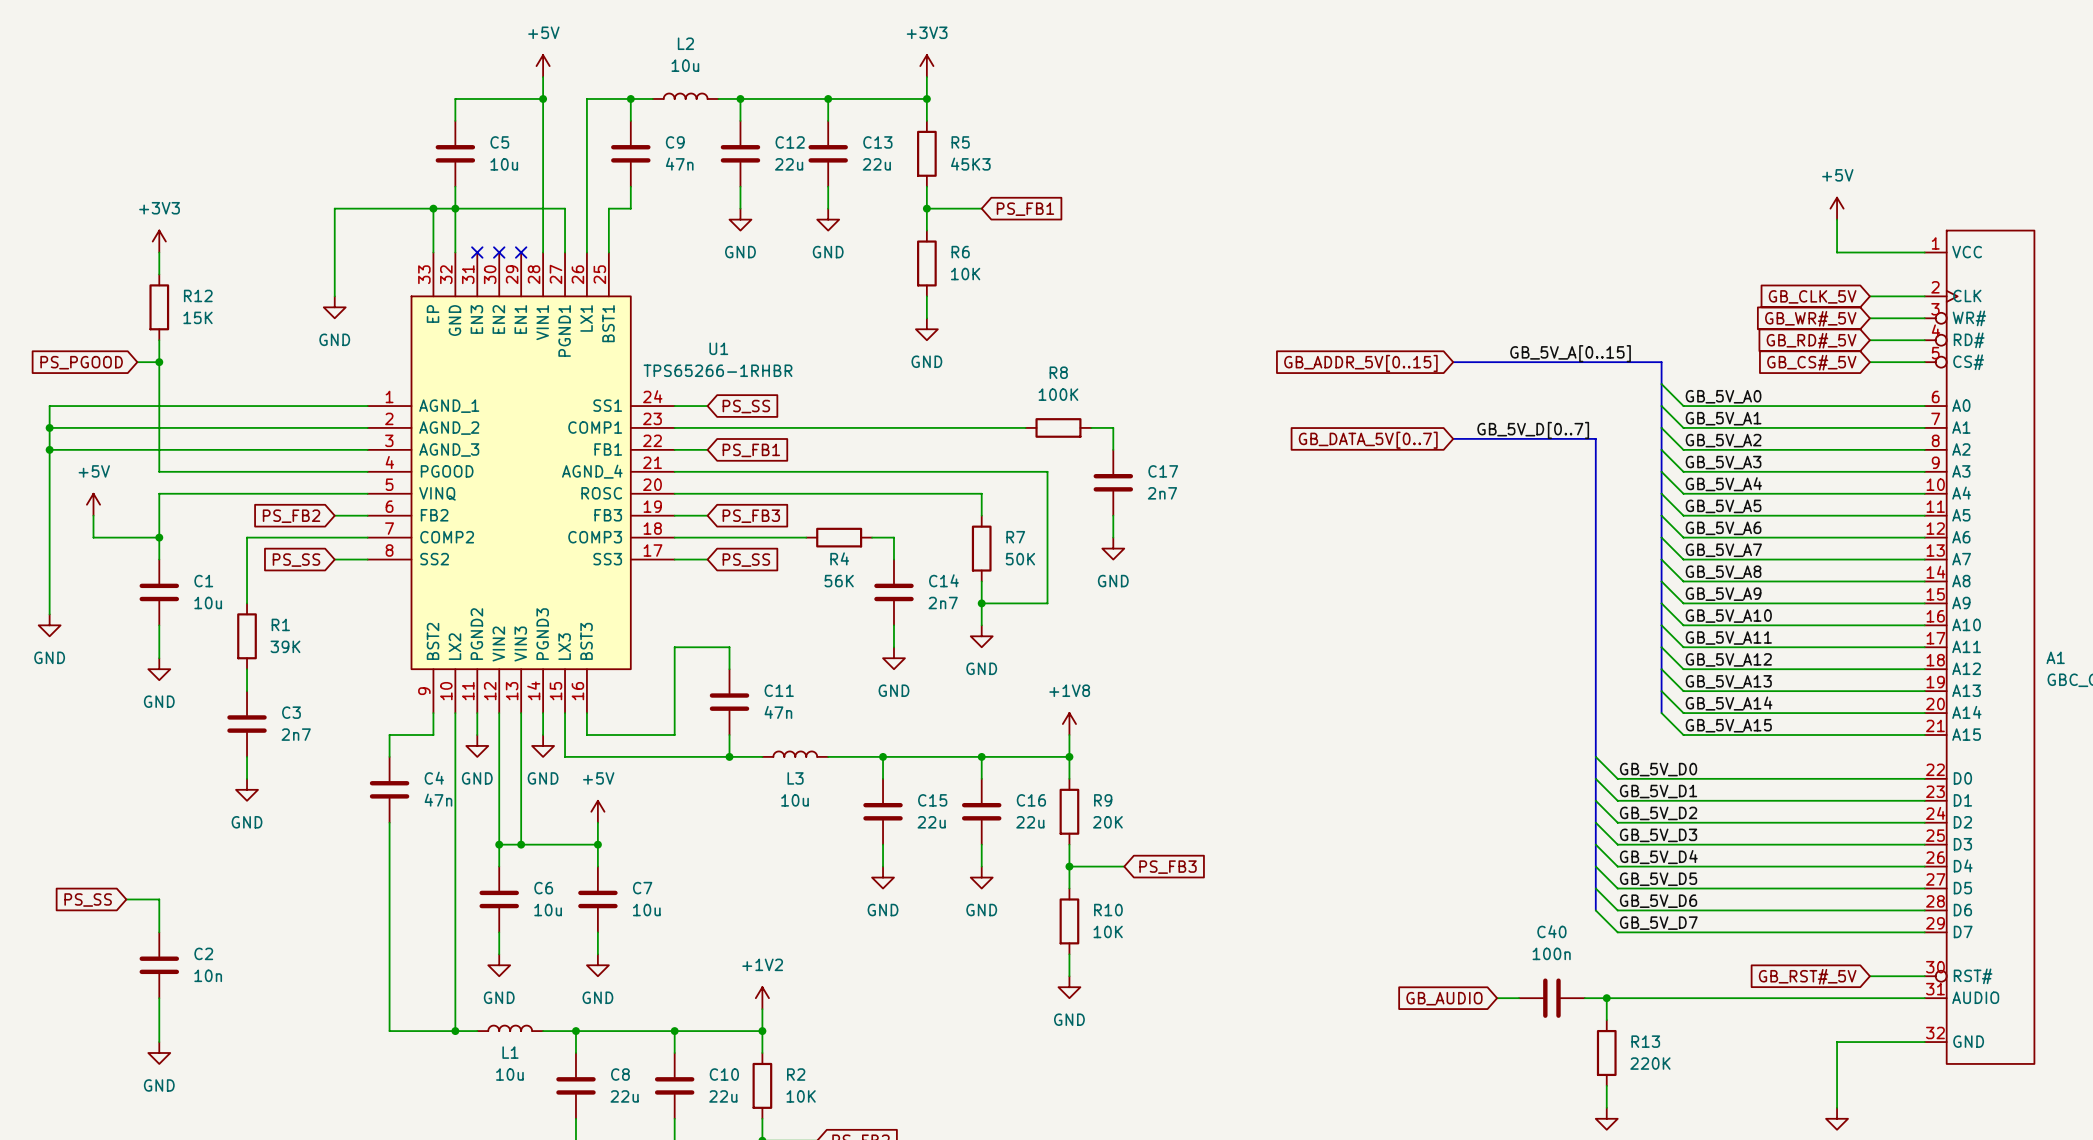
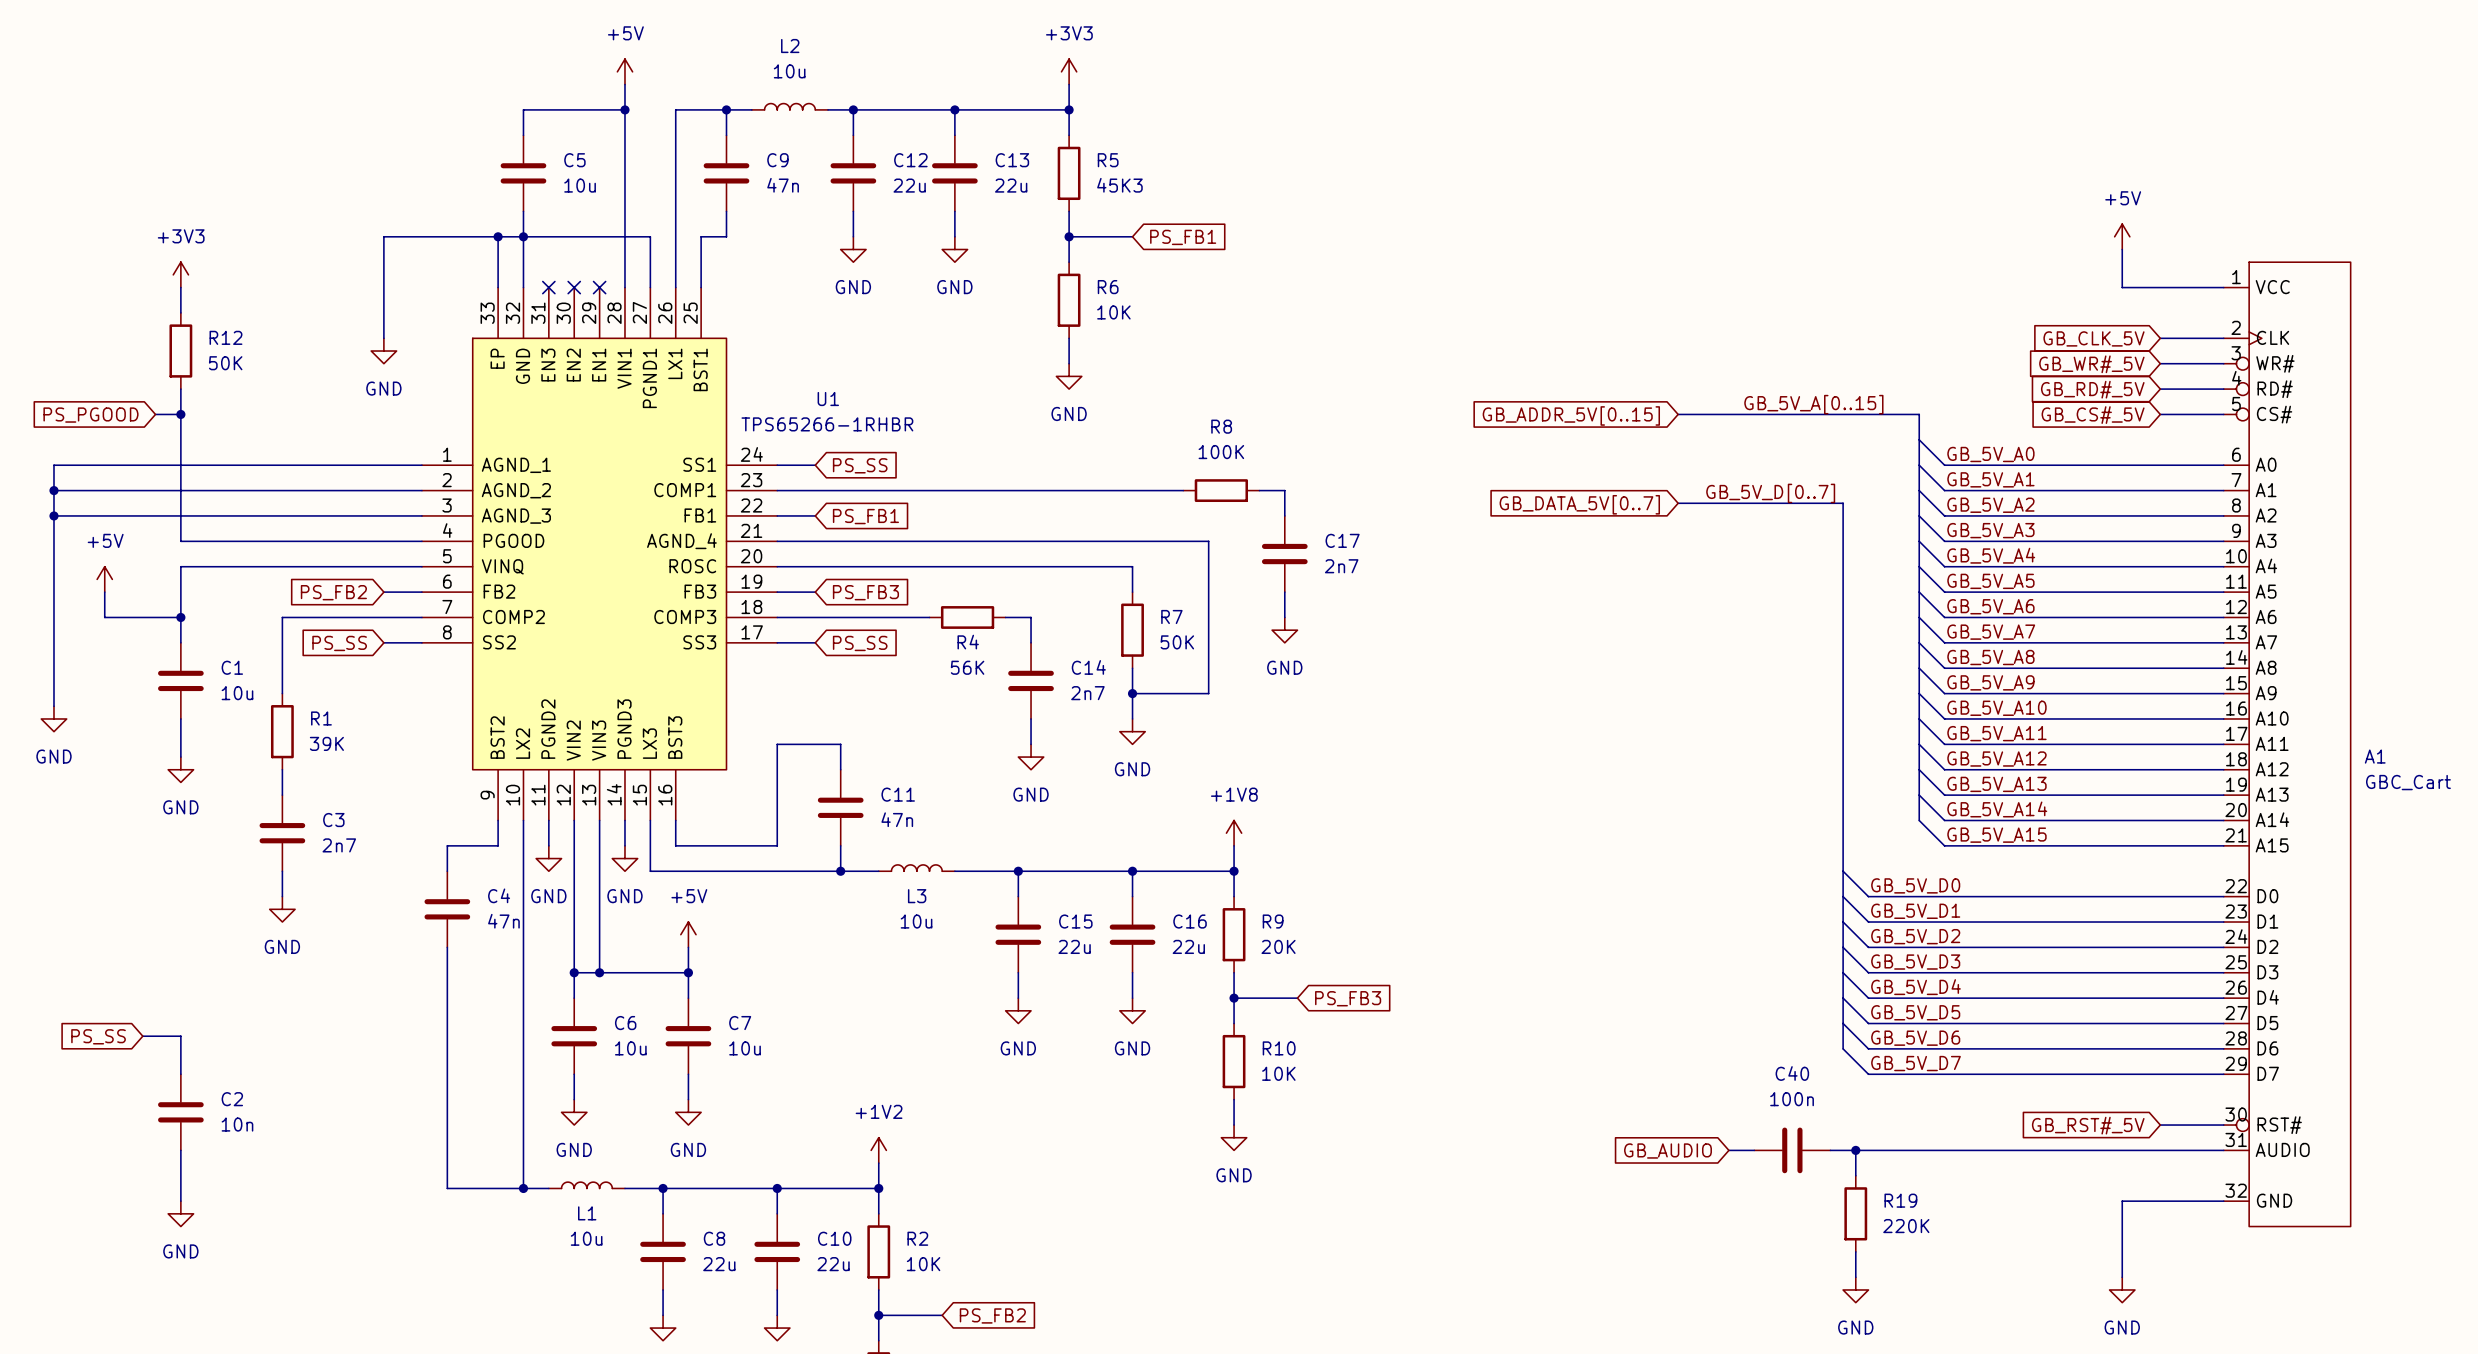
R12 value: 15K (198, 317) -> 50K (225, 363)
R13 name: R13 (1645, 1041) -> R19 (1900, 1200)

